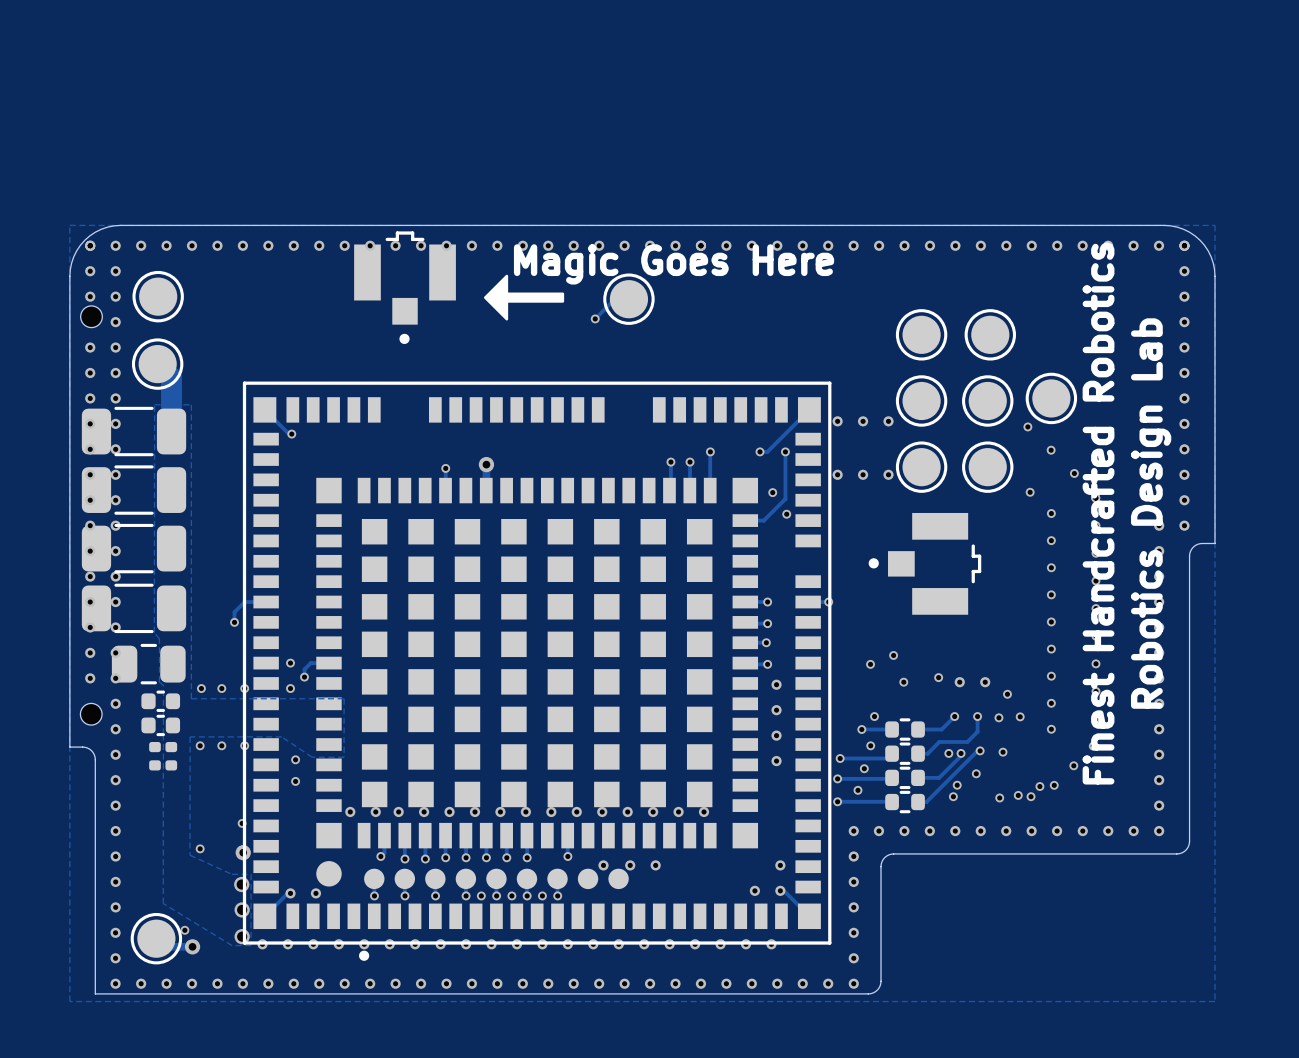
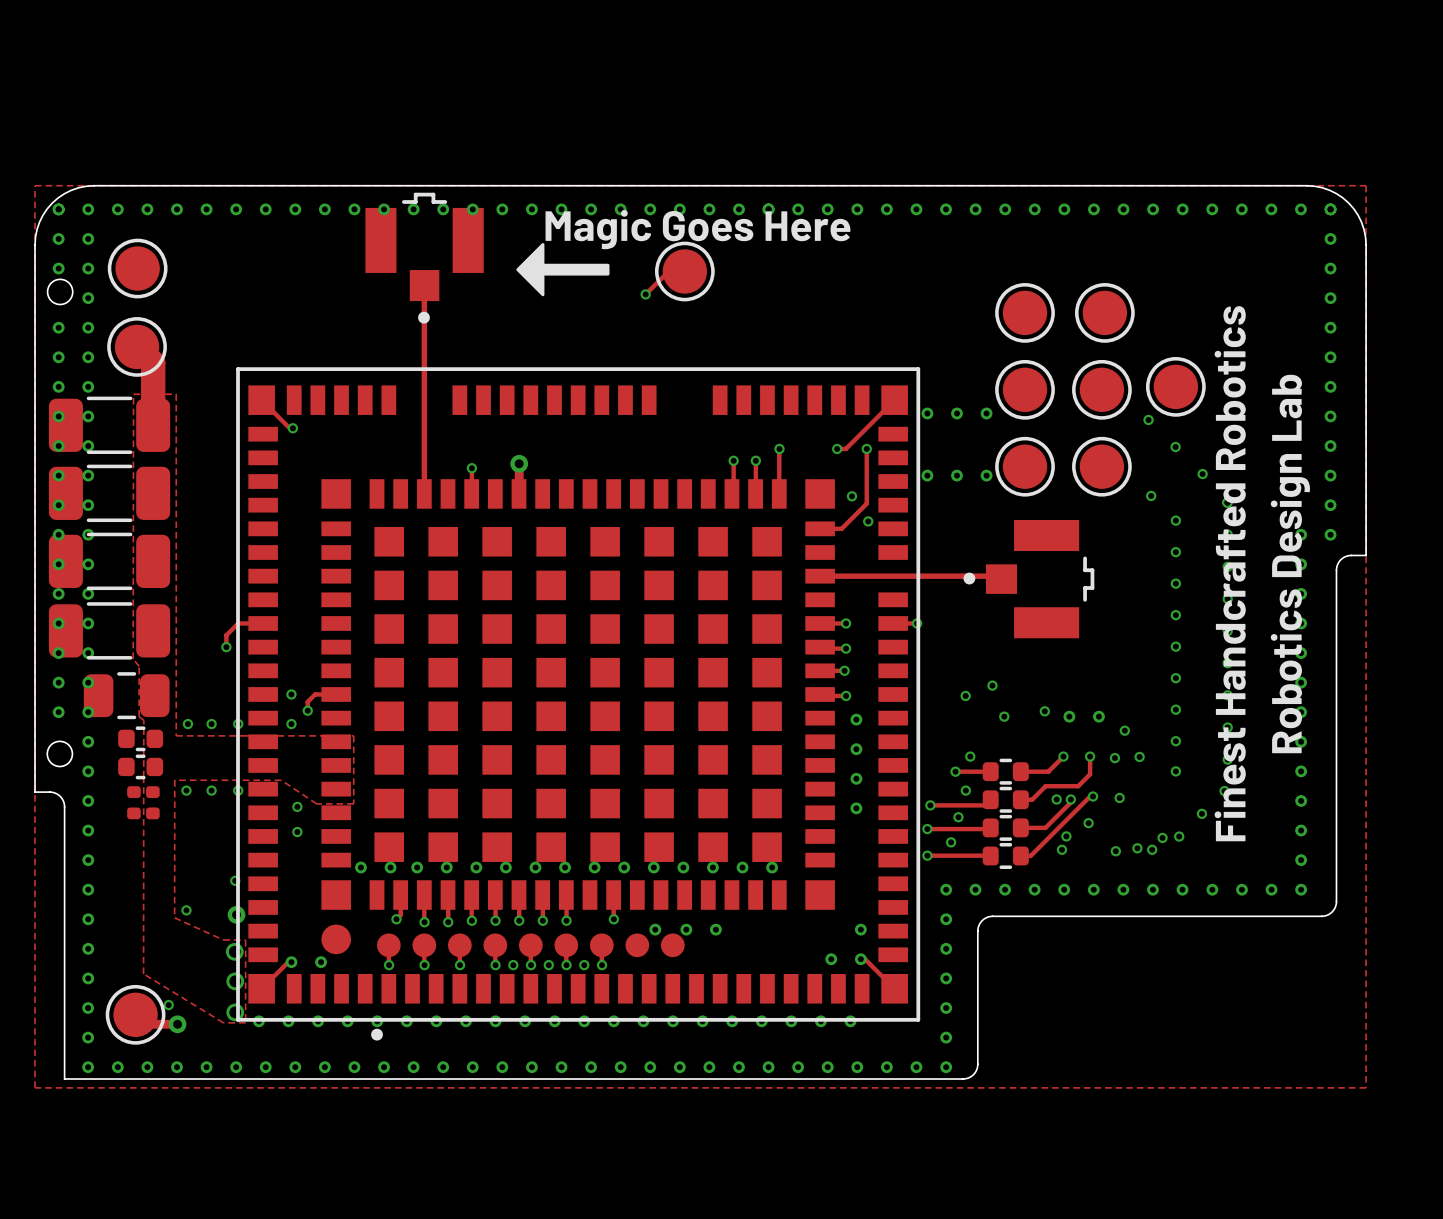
track: none -> (424, 285) (424, 493)
track: none -> (820, 576) (998, 576) (1001, 579)

